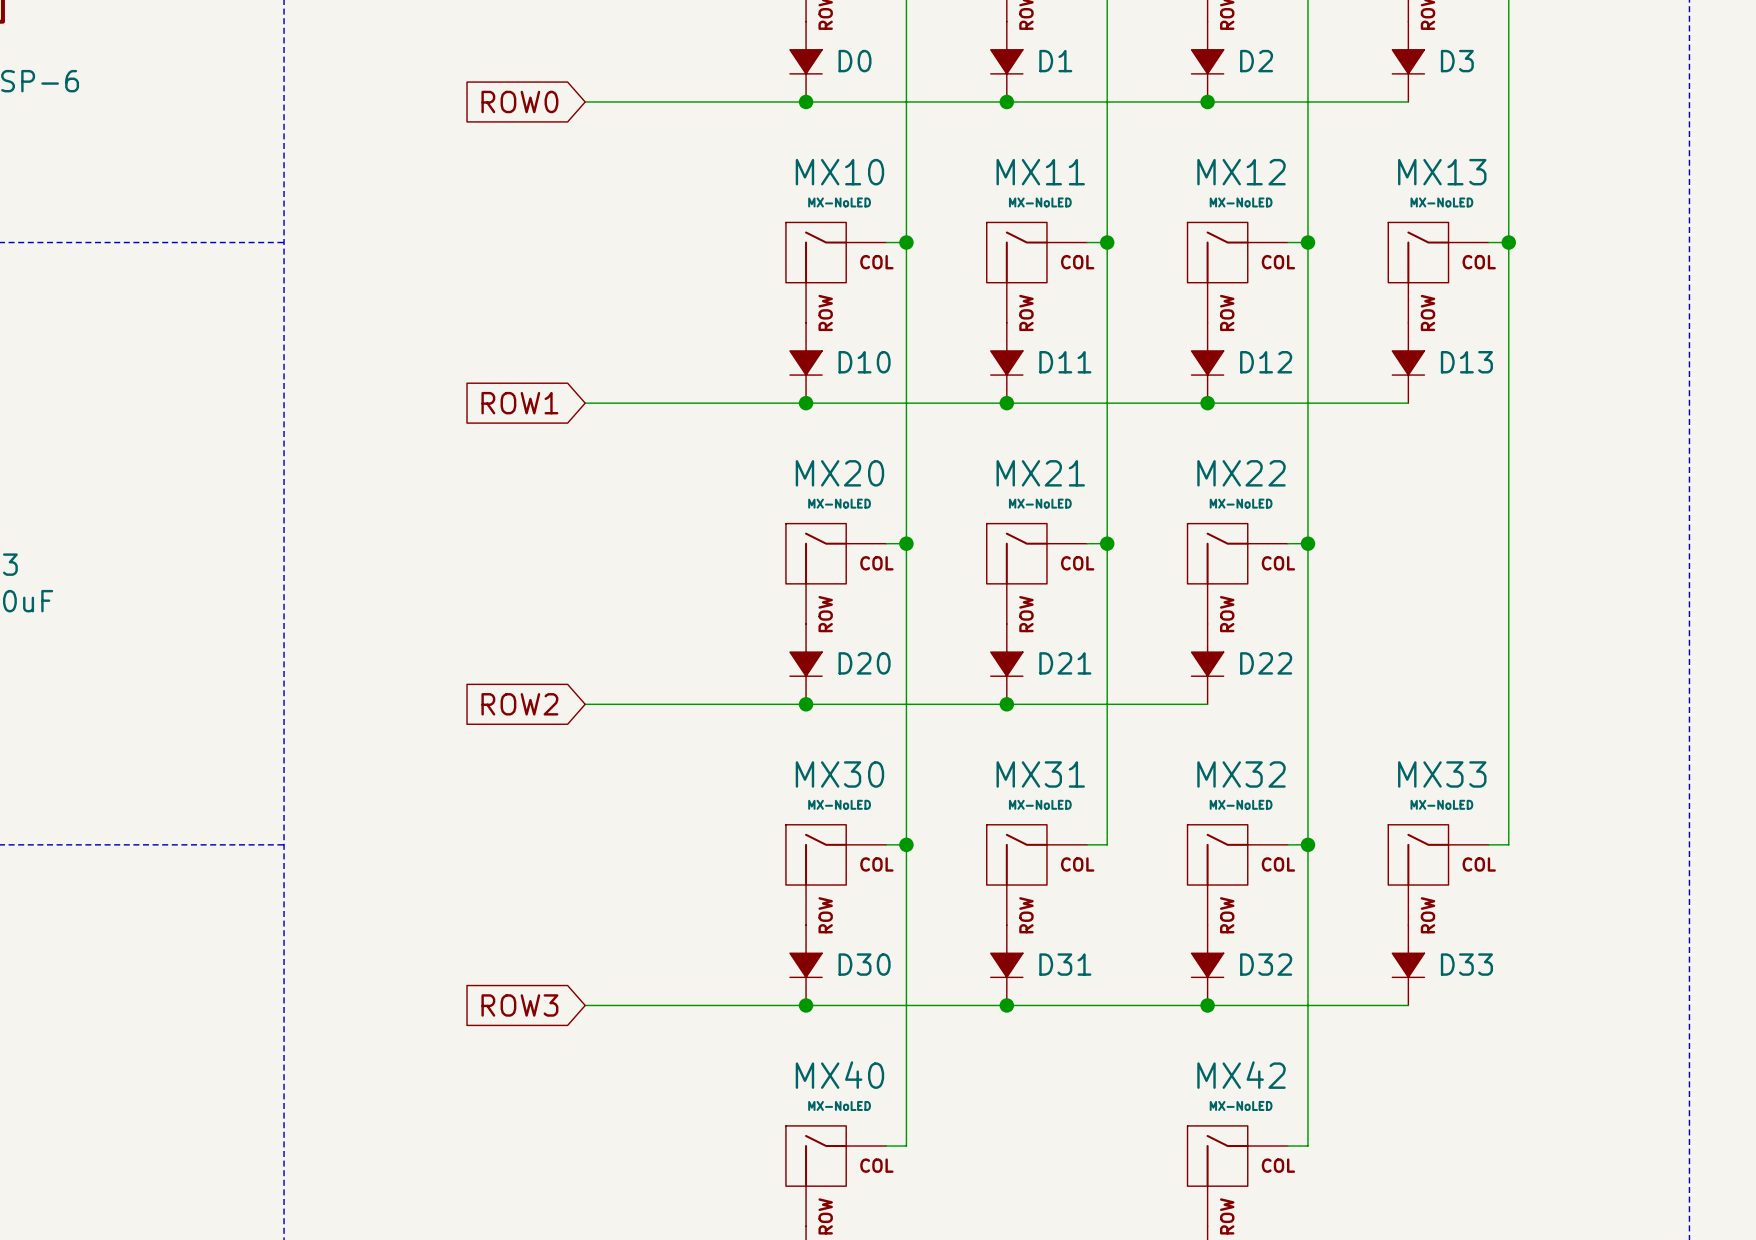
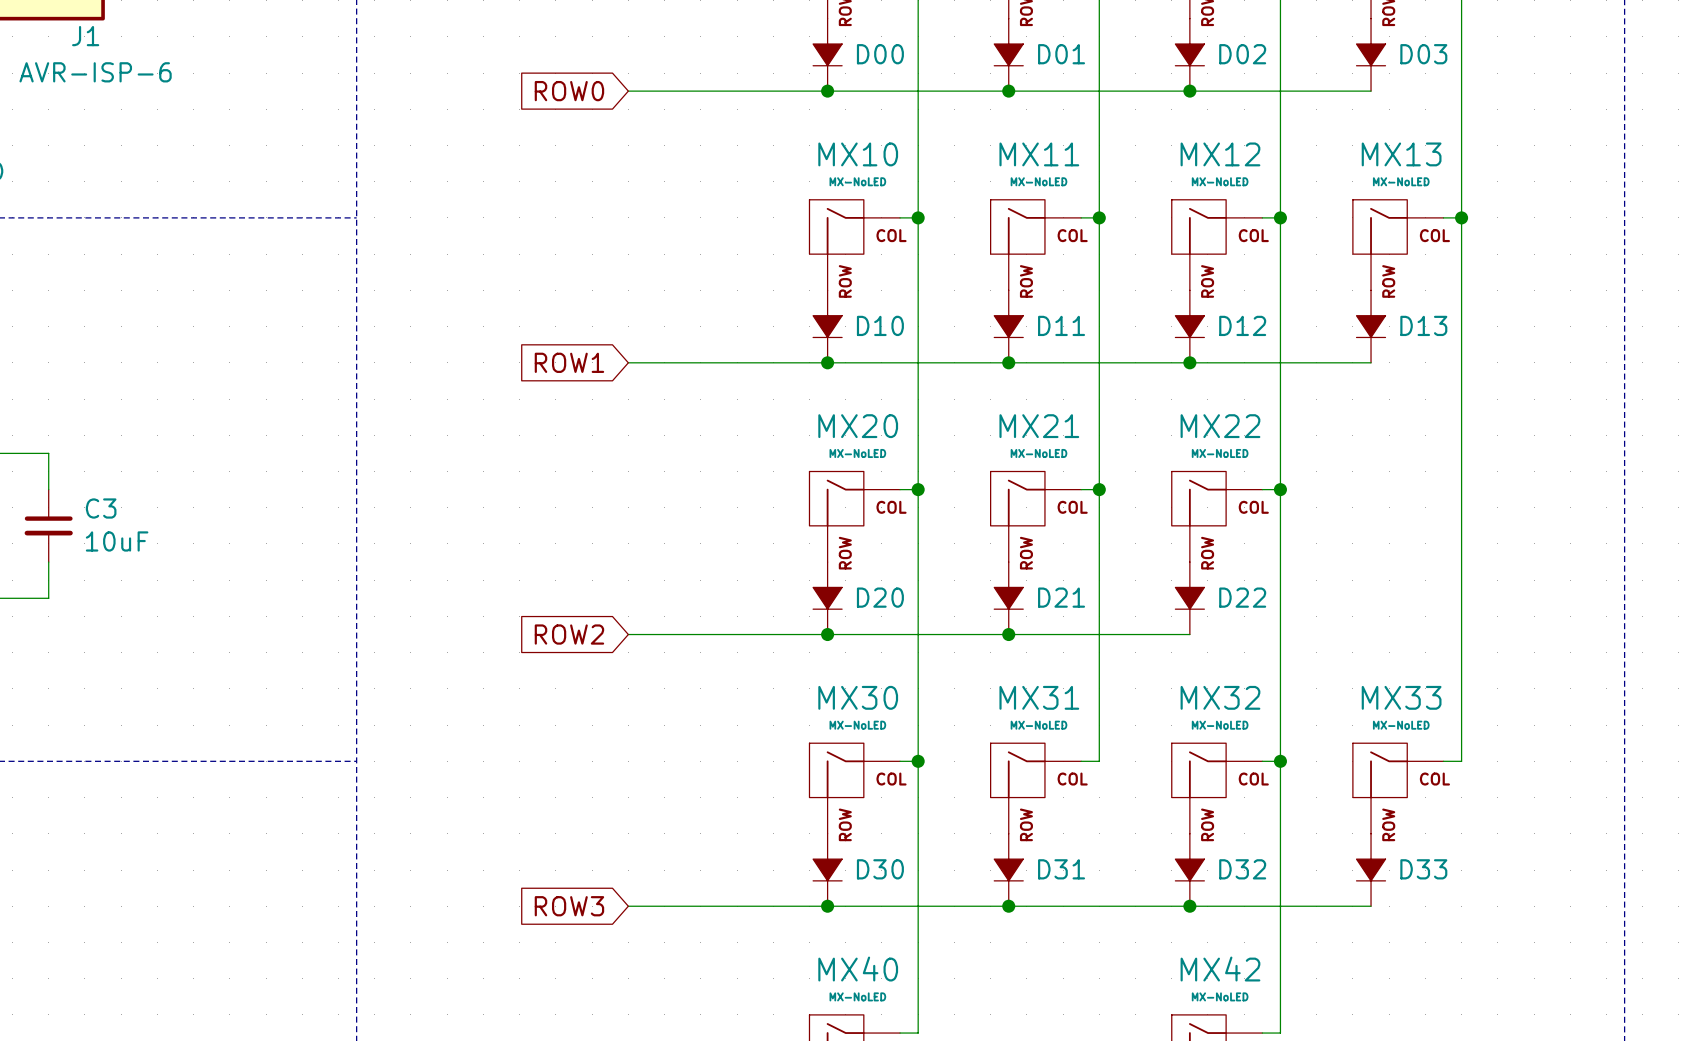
D0 name: D0 (855, 61) -> D00 (880, 54)
D1 name: D1 (1055, 61) -> D01 (1061, 54)
D2 name: D2 (1256, 61) -> D02 (1242, 54)
D3 name: D3 (1457, 61) -> D03 (1423, 54)

